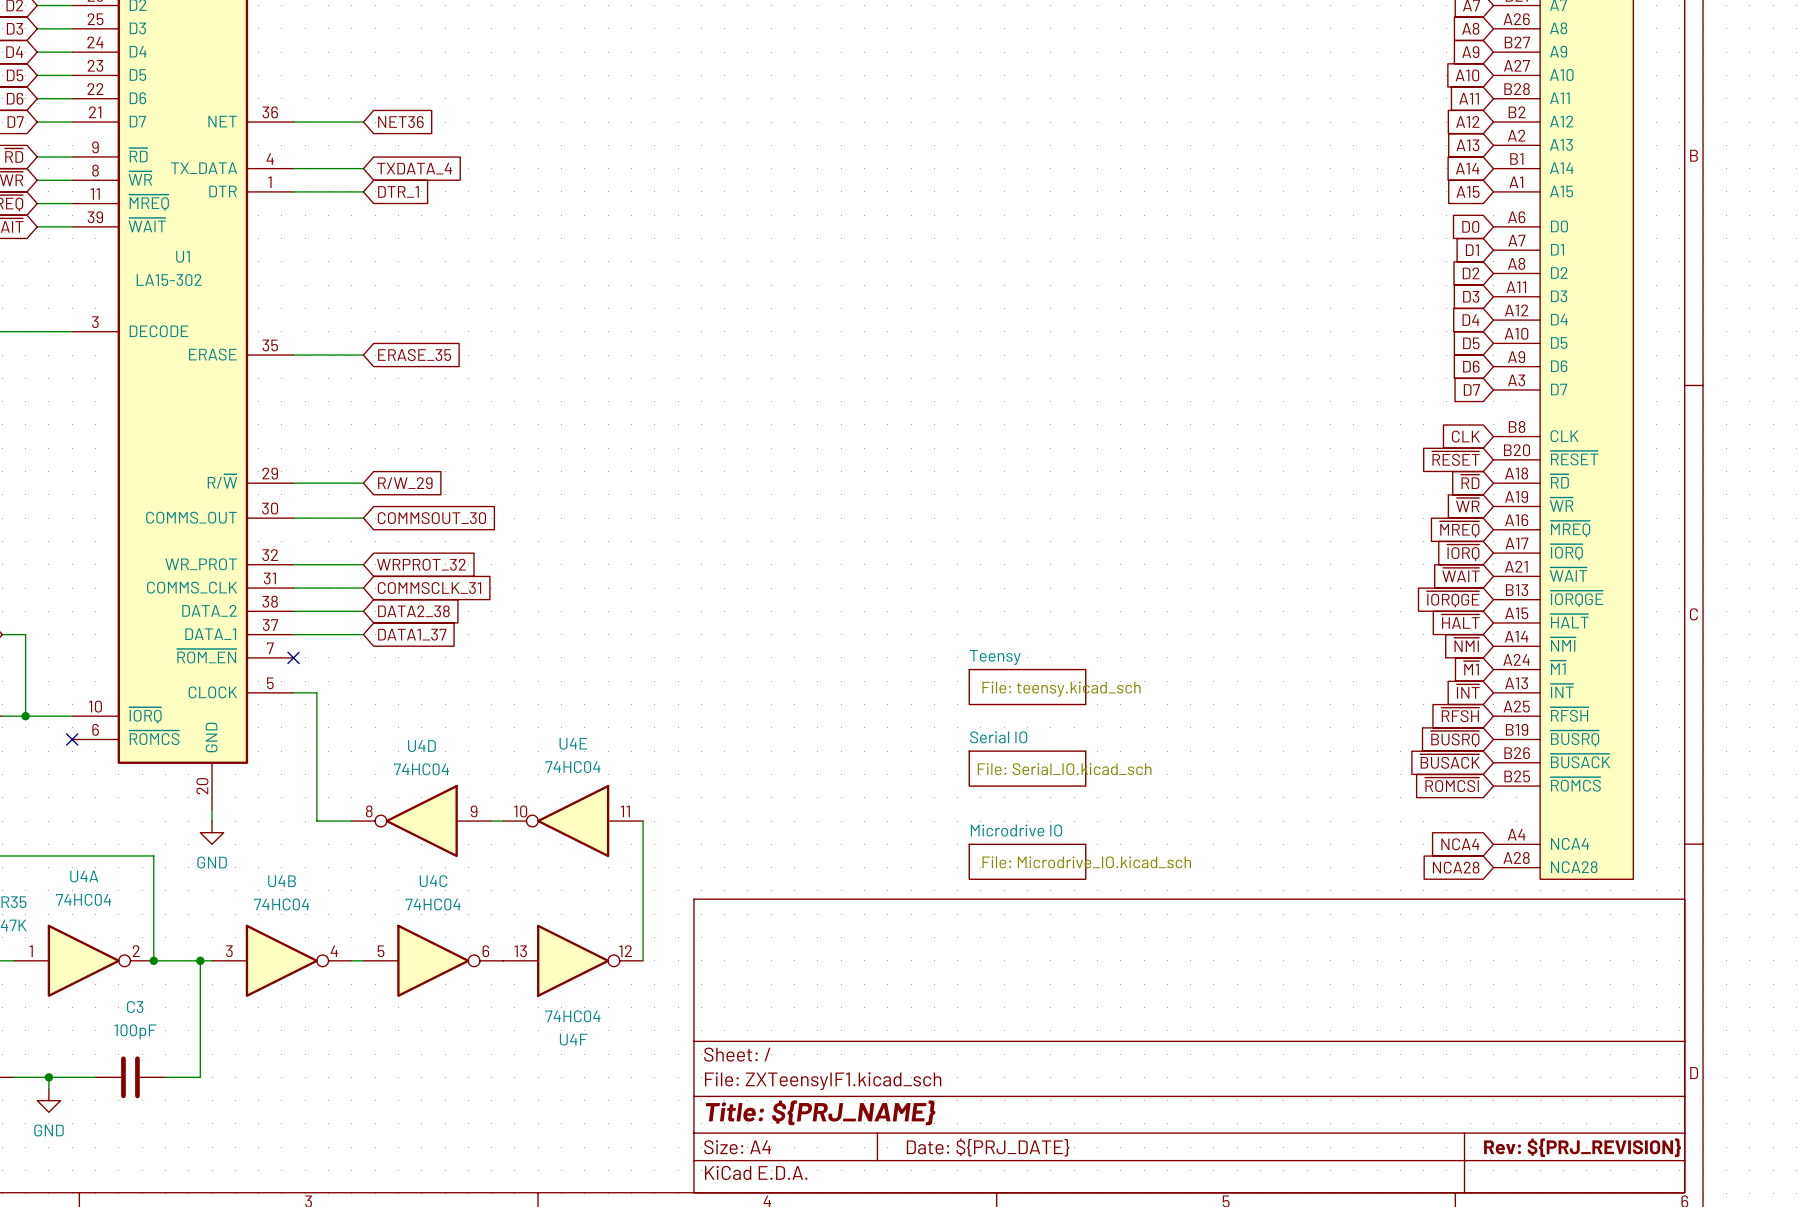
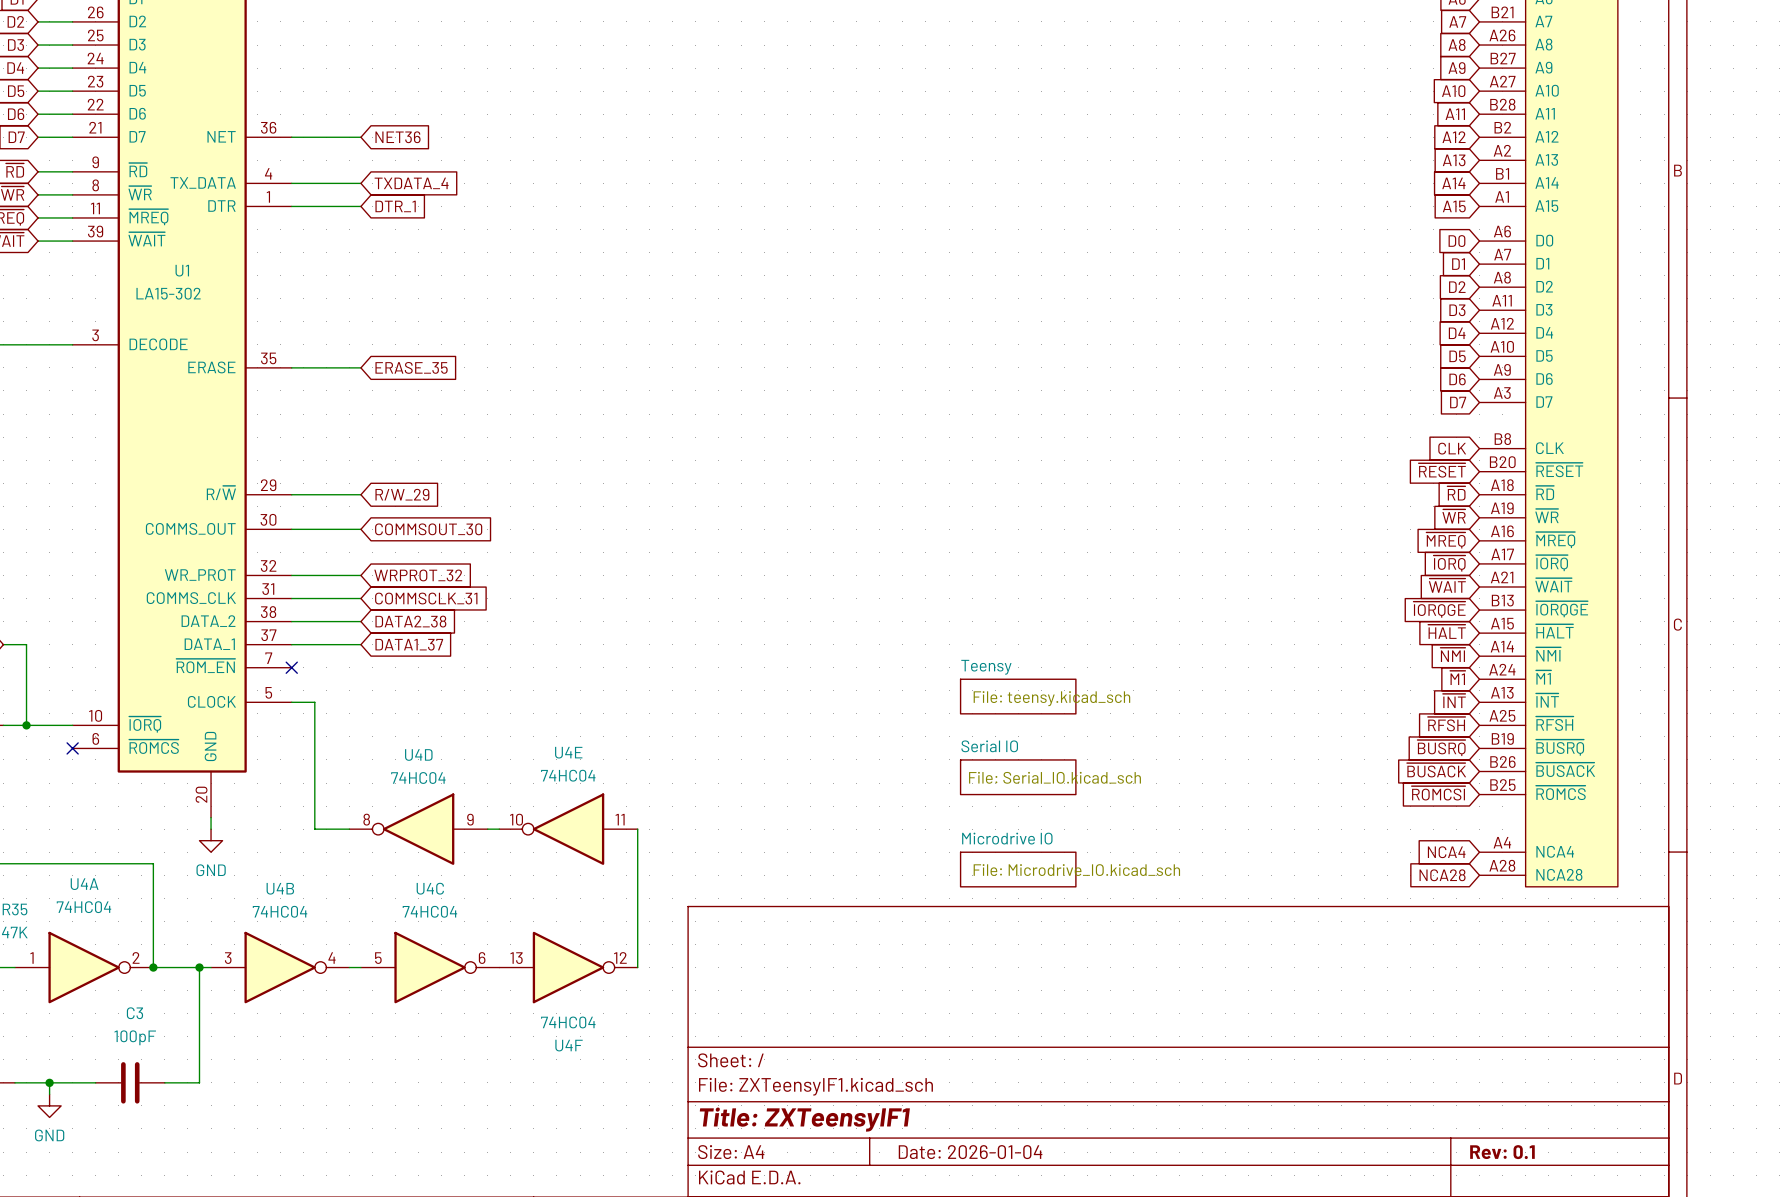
title block: Title: ${PRJ_NAME} (820, 1112) -> Title: ZXTeensyIF1 (804, 1119)
title block: Date: ${PRJ_DATE} (988, 1147) -> Date: 2026-01-04 (970, 1152)
title block: Rev: ${PRJ_REVISION} (1582, 1147) -> Rev: 0.1 (1502, 1152)

